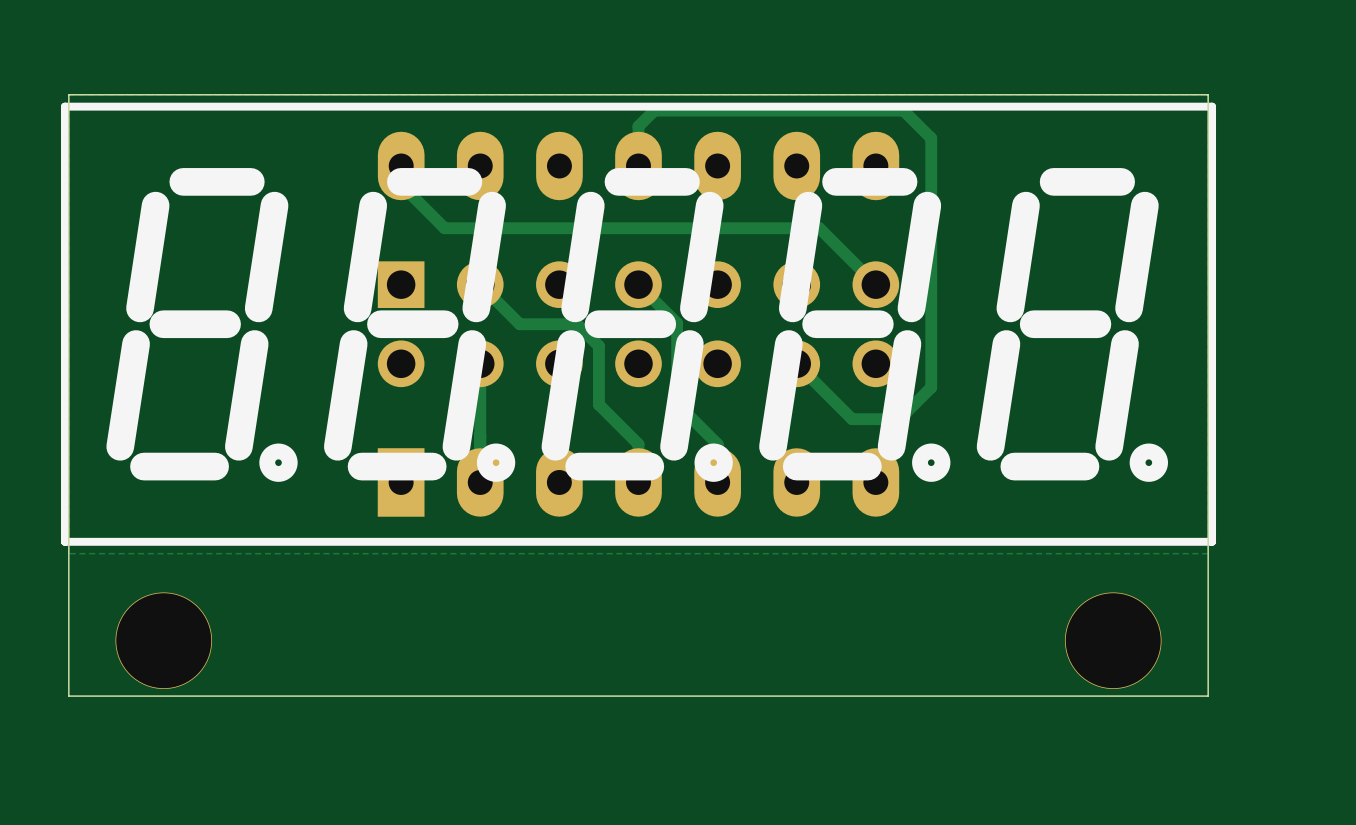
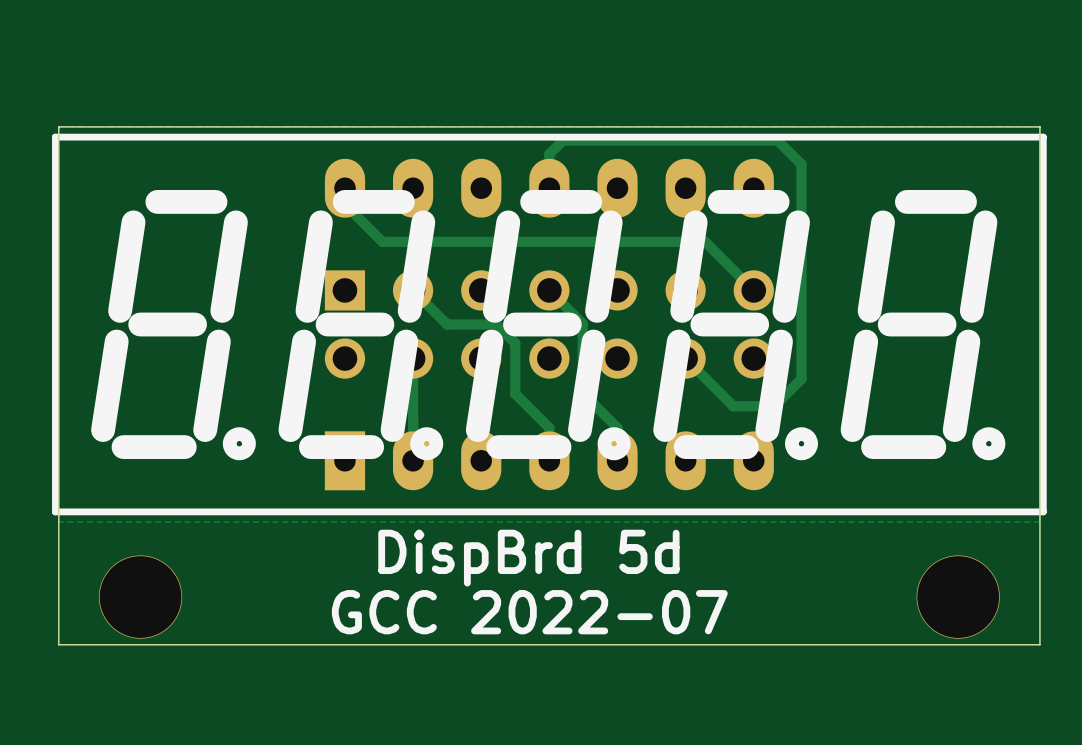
text: none -> DispBrd 5d (528, 558)
text: none -> GCC 2022-07 (529, 612)

